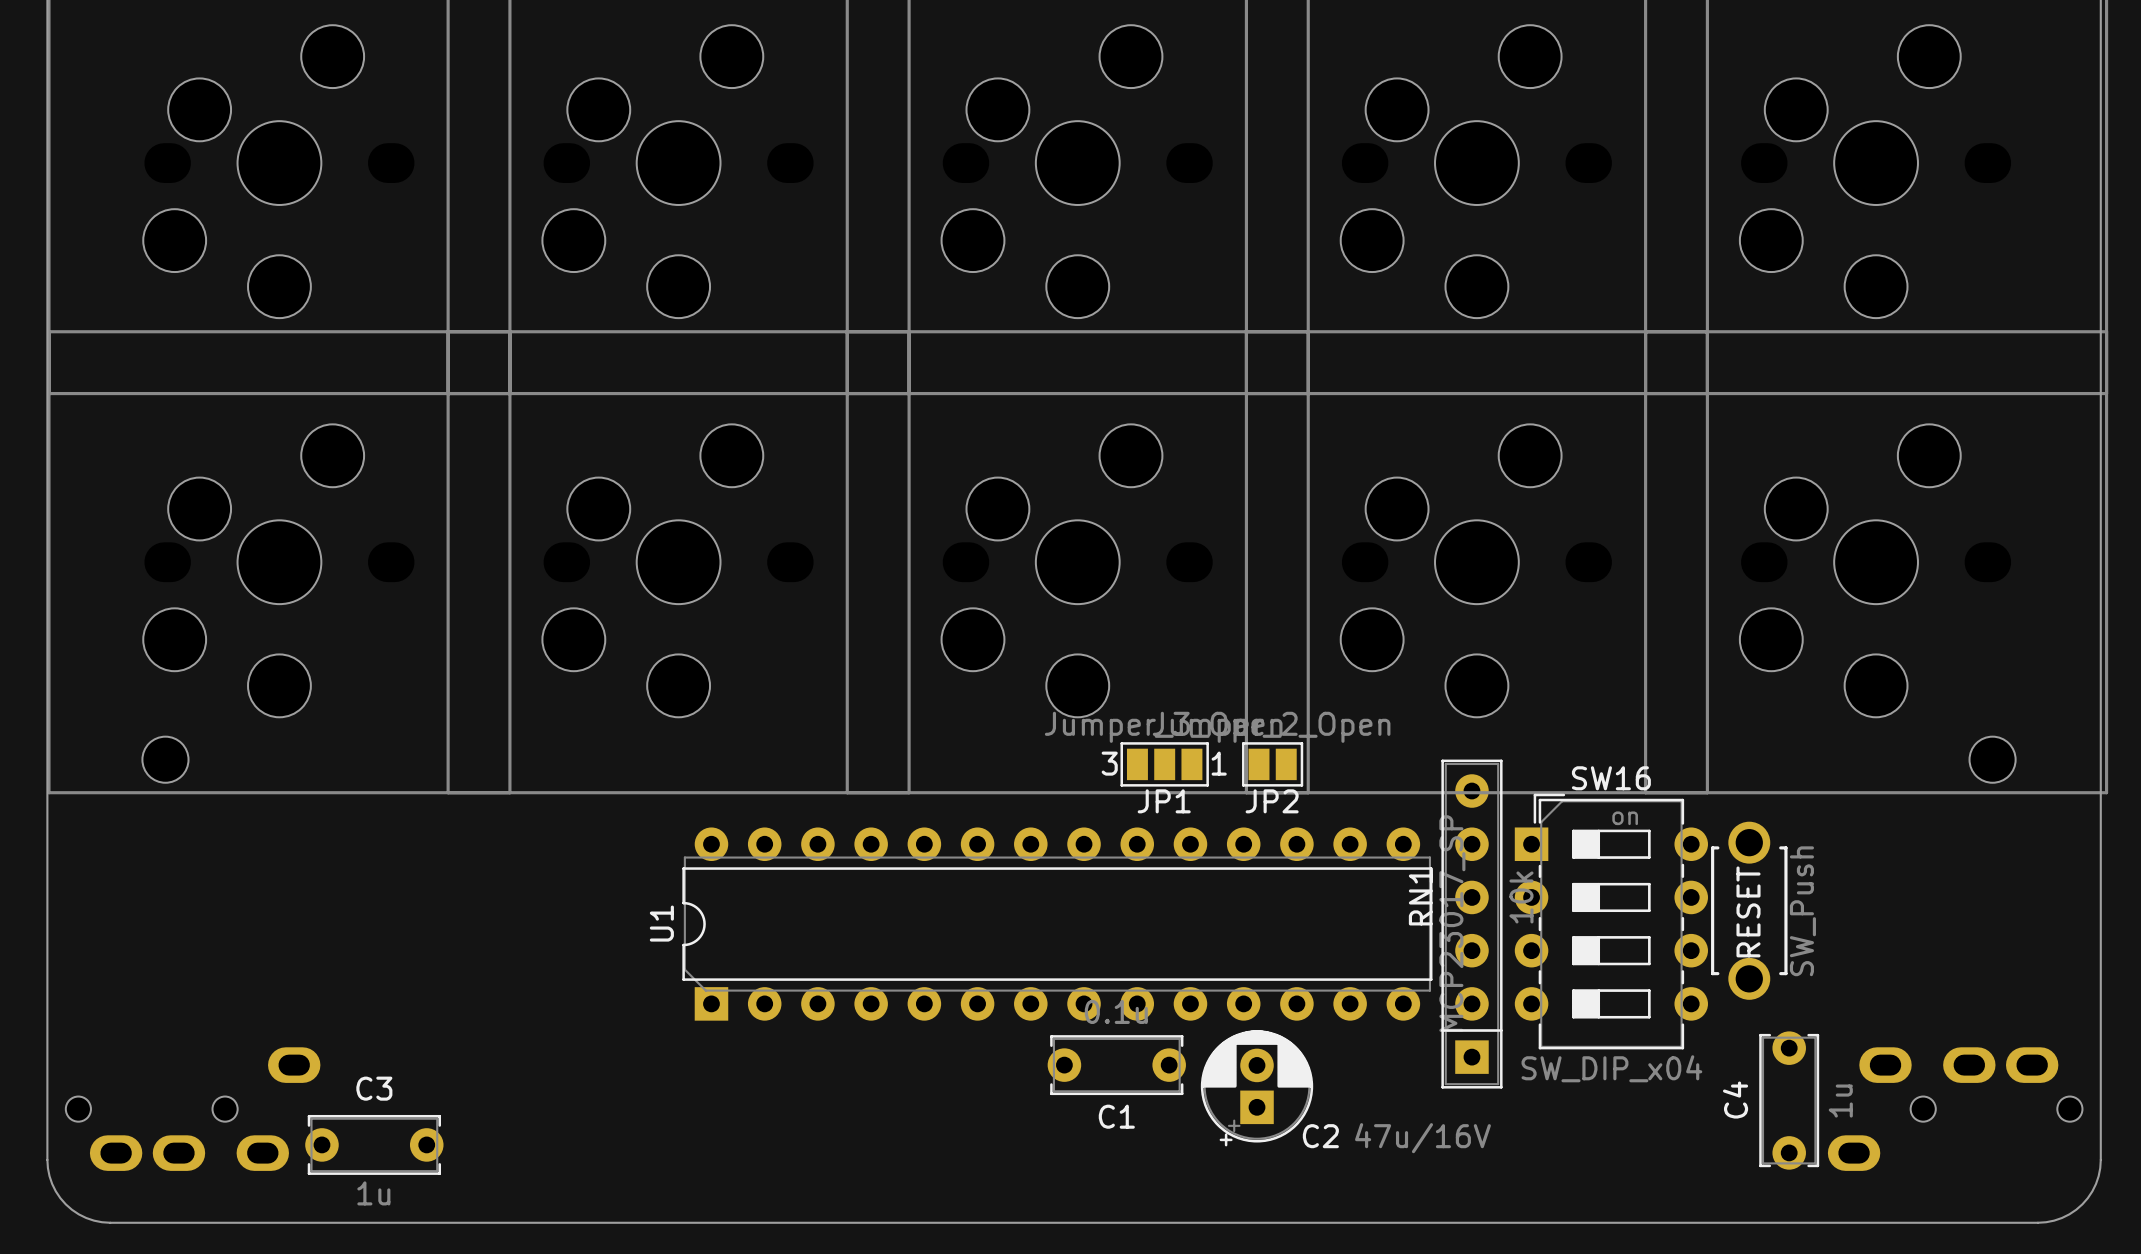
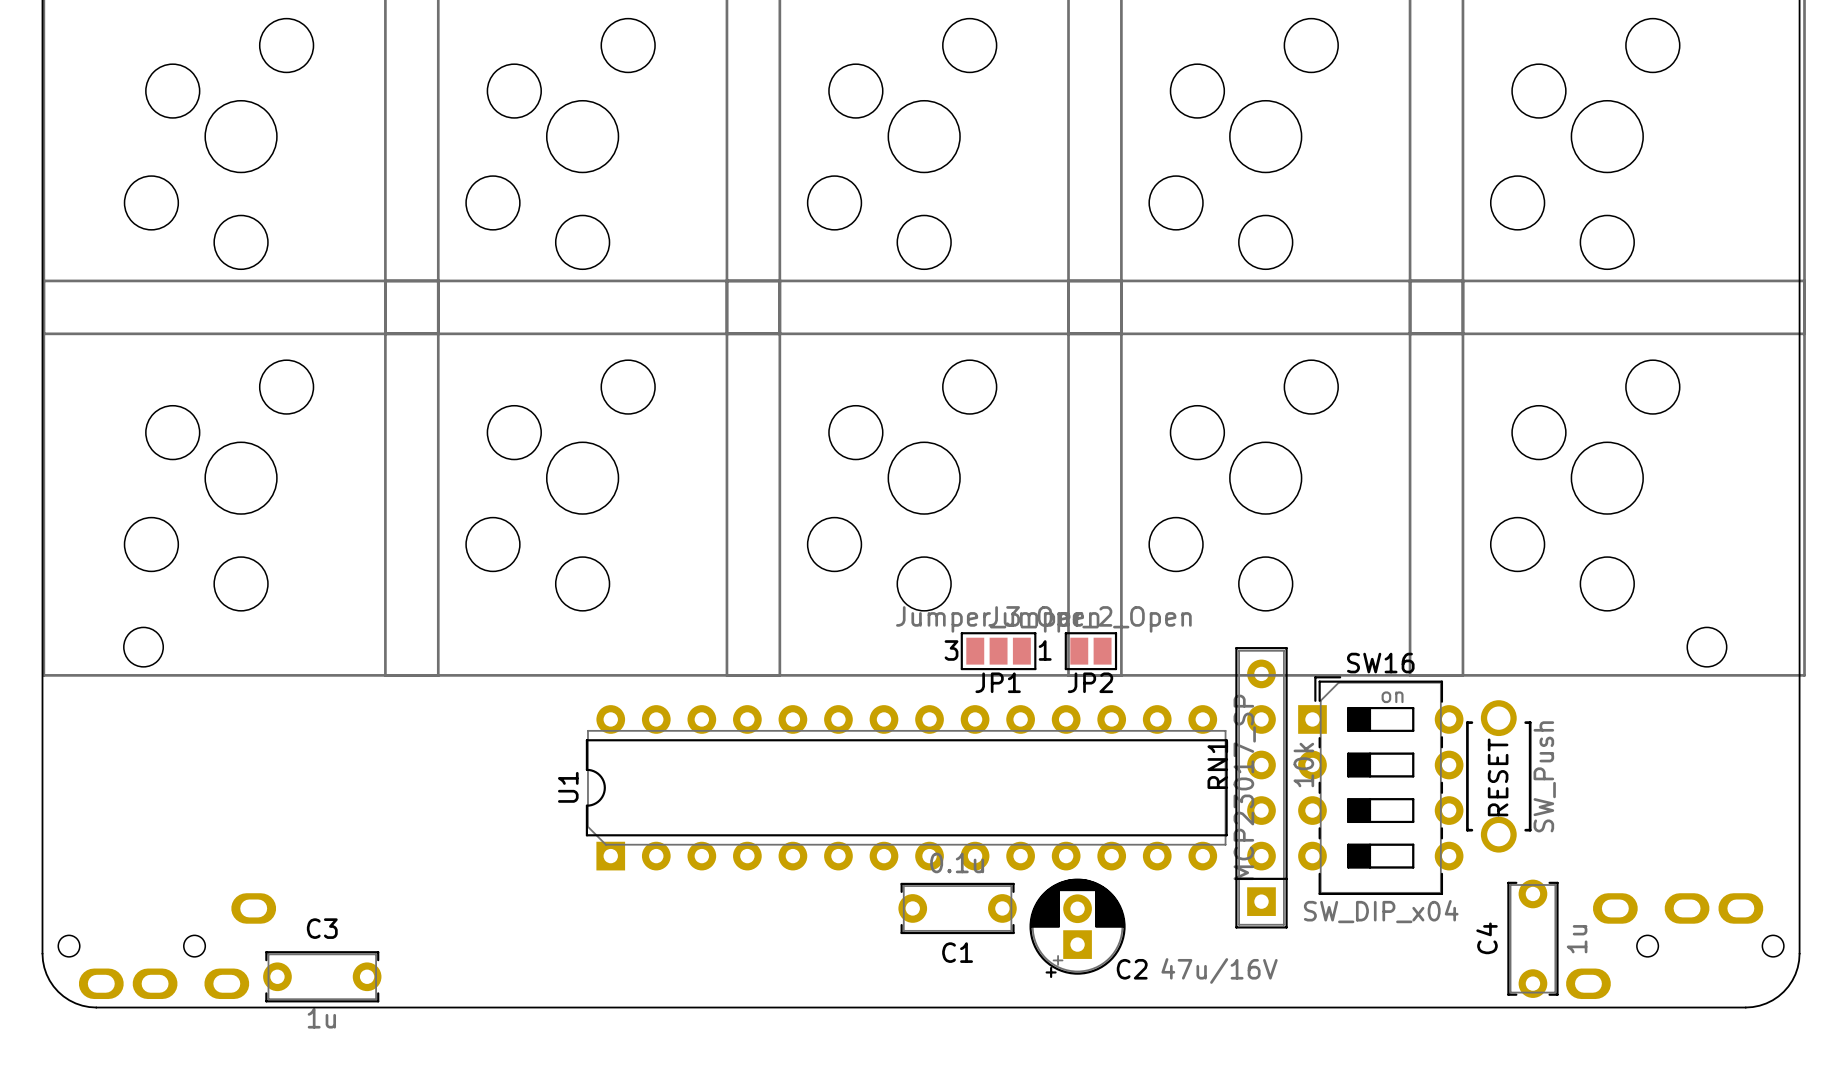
board edge: (47, 1118) (47, 1168) (55, 1191) (65, 1204) (78, 1214) (93, 1220) (110, 1222) (2037, 1222) (2054, 1220) (2069, 1214) (2082, 1204) (2092, 1191) (2100, 1168) (2100, 1118) -> (42, 953) (46, 974) (58, 991) (75, 1003) (96, 1007) (1745, 1007) (1766, 1003) (1783, 991) (1795, 974) (1799, 953)

